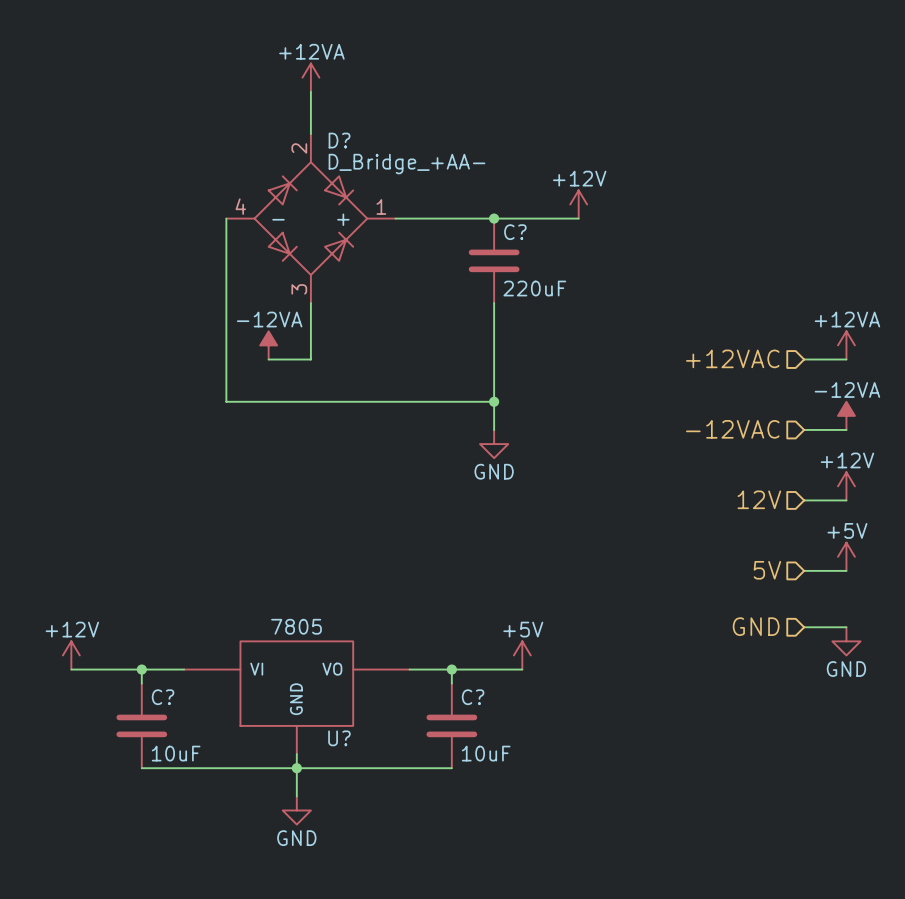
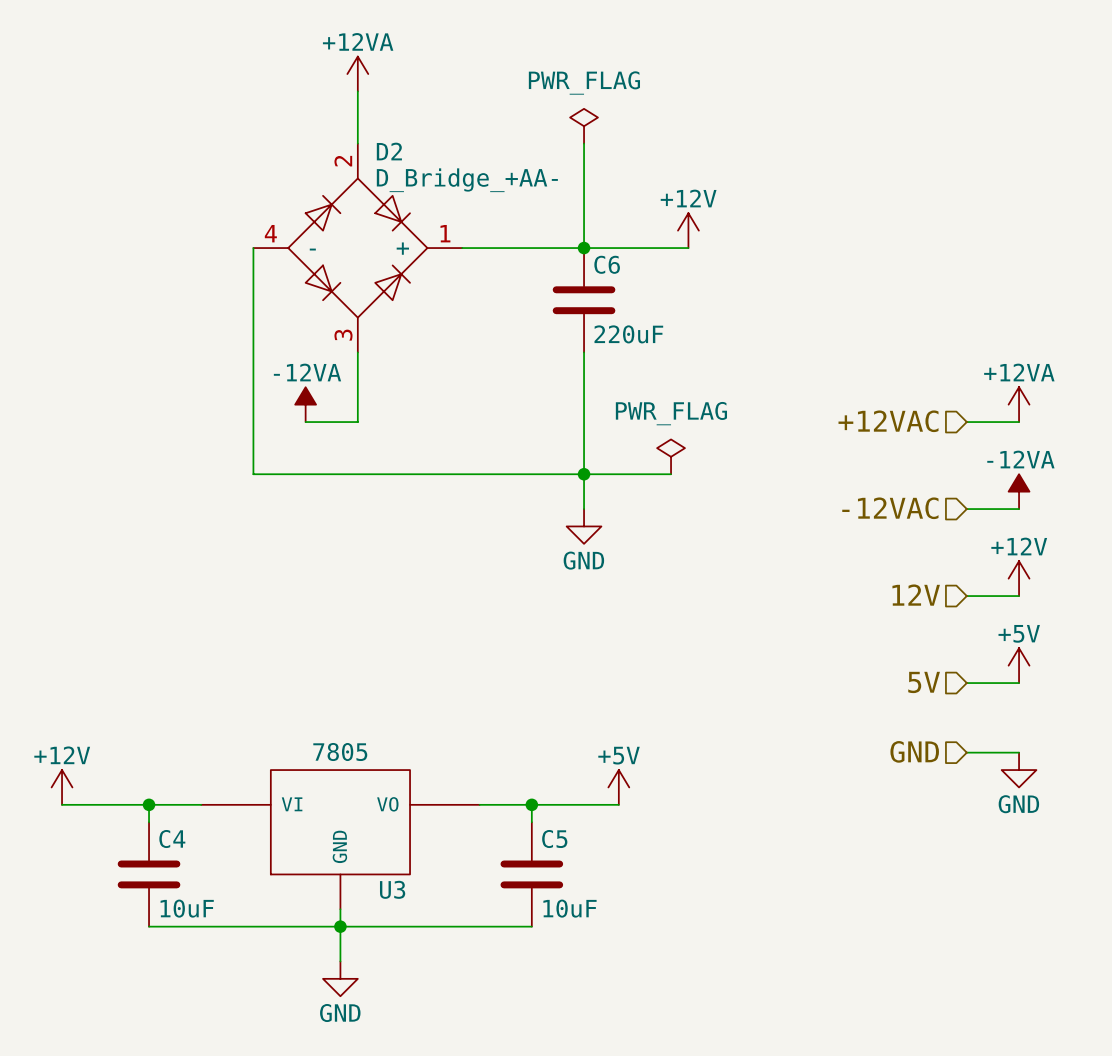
power symbol: none -> PWR_FLAG (584, 126)
wire: none -> (584, 143) (584, 248)
D? name: D? (339, 140) -> D2 (389, 151)
C? name: C? (515, 232) -> C6 (607, 264)
power symbol: none -> PWR_FLAG (671, 456)
wire: none -> (584, 474) (671, 474)
C? name: C? (163, 697) -> C4 (172, 839)
C? name: C? (473, 697) -> C5 (554, 839)
U? name: U? (339, 738) -> U3 (392, 889)

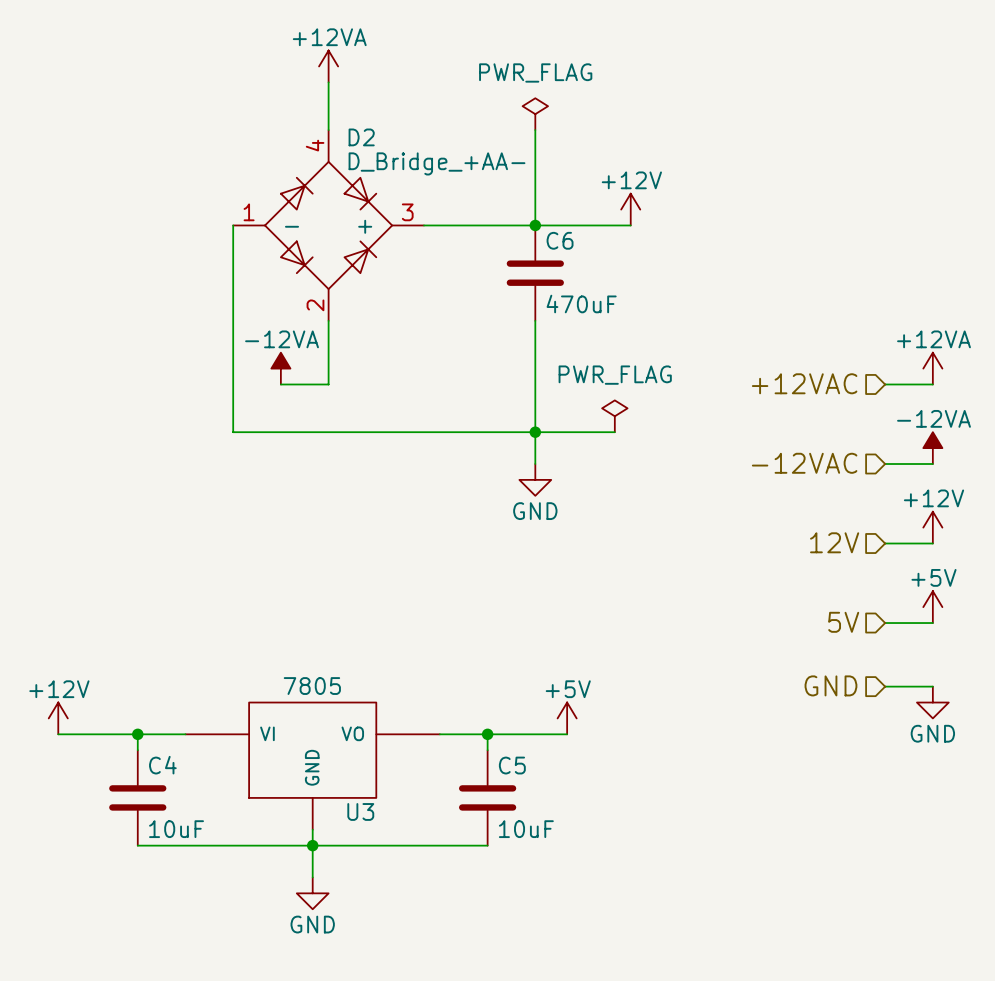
D2 pin number: 2 (343, 161) -> 4 (315, 145)
D2 pin number: 4 (270, 233) -> 1 (249, 212)
D2 pin number: 1 (445, 233) -> 3 (407, 212)
C6 value: 220uF (628, 334) -> 470uF (581, 304)
D2 pin number: 3 (343, 335) -> 2 (315, 305)

